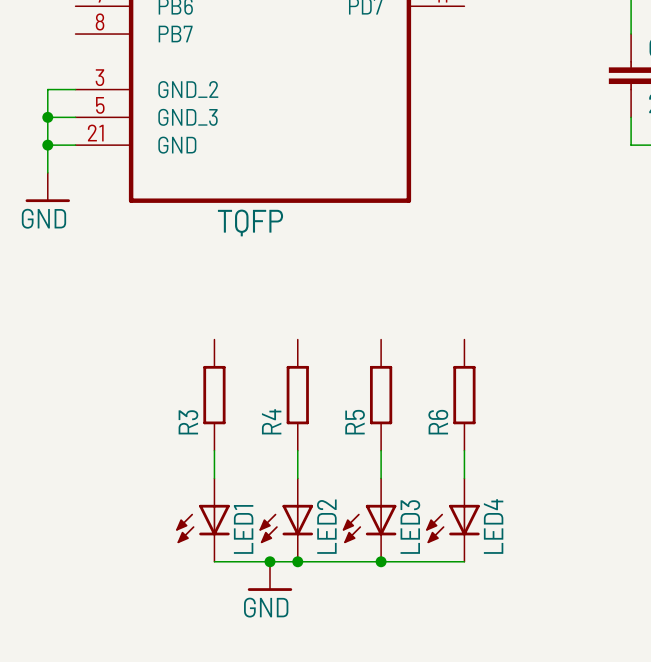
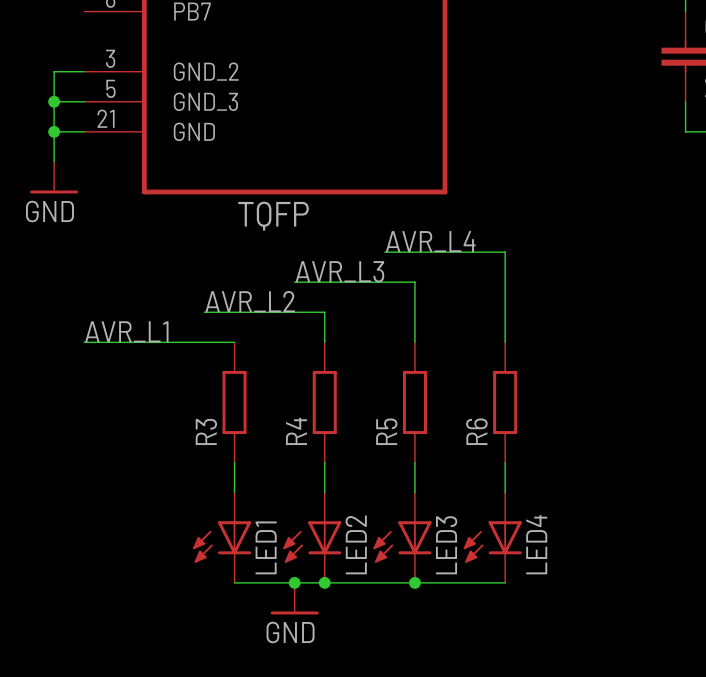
label: none -> AVR_L4 (430, 241)
wire: none -> (384, 252) (505, 252) (505, 342)
label: none -> AVR_L3 (339, 271)
wire: none -> (294, 282) (414, 282) (414, 342)
label: none -> AVR_L2 (250, 301)
wire: none -> (204, 312) (324, 312) (324, 342)
label: none -> AVR_L1 (126, 331)
wire: none -> (84, 342) (234, 342)

